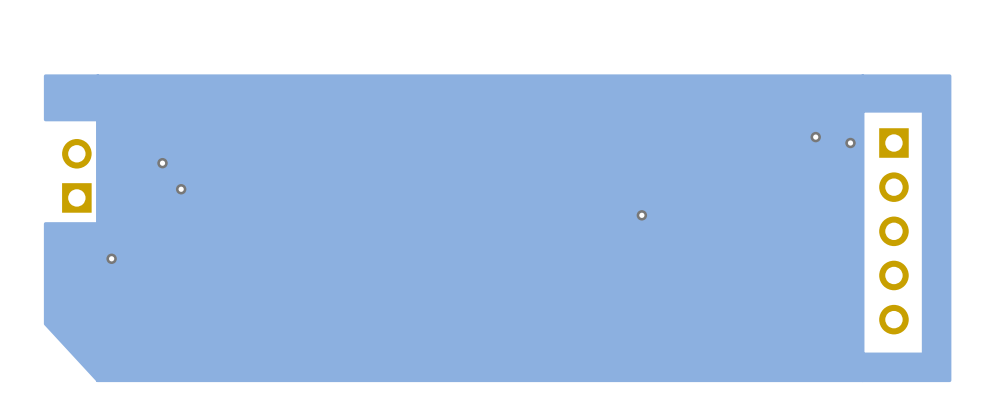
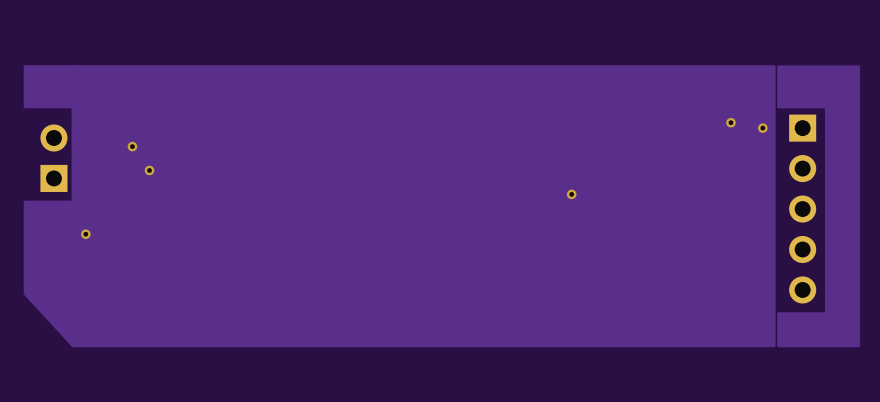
drawing shape: [860, 74, 952, 383] -> [777, 65, 861, 348]

